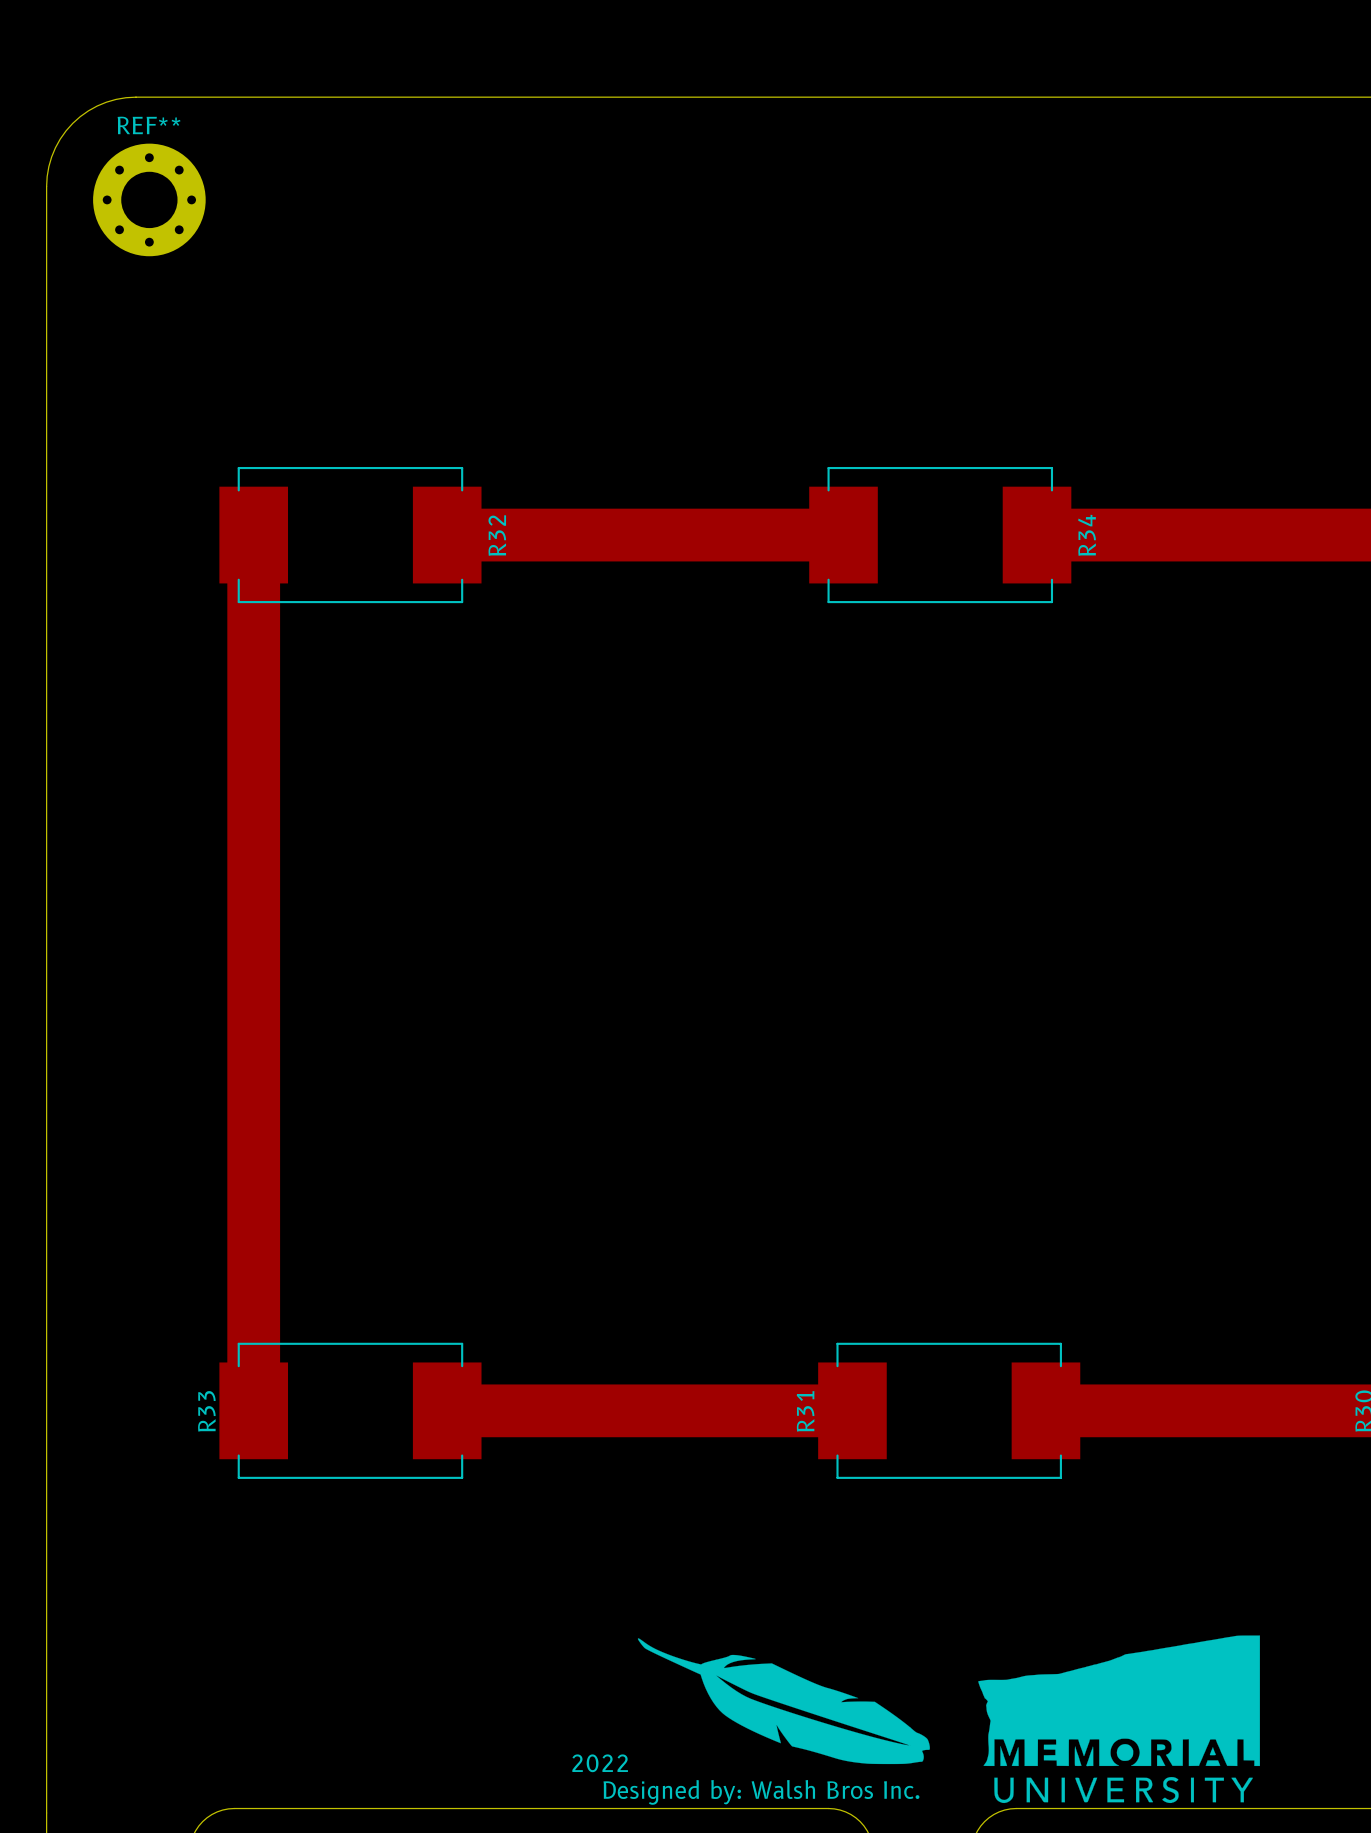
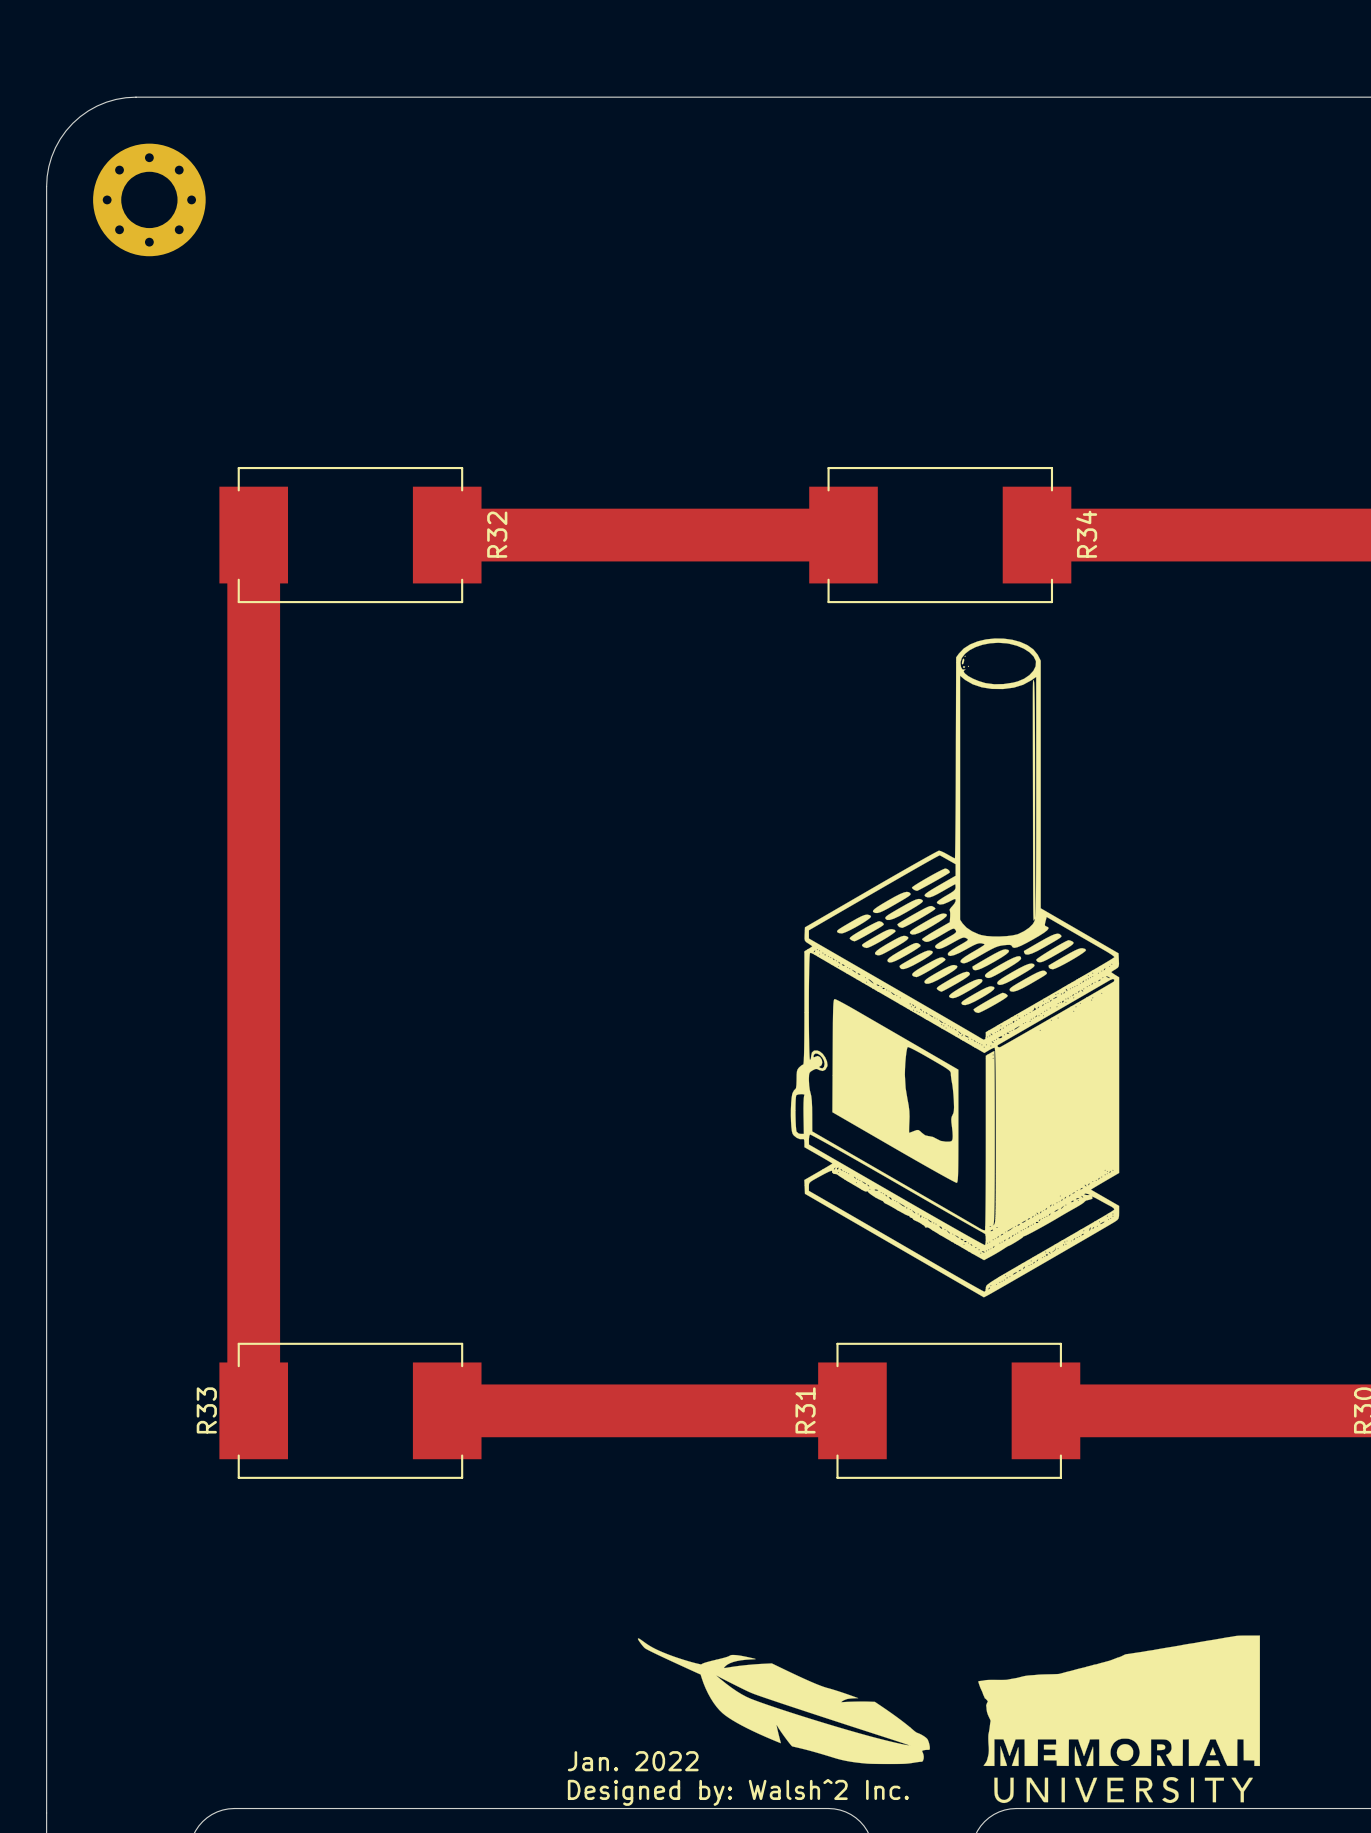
REF** name: REF** (149, 125) -> none
drawing: none -> [790, 638, 1120, 1298]
text: 2022 (600, 1763) -> Jan. 2022 (633, 1761)
text: Designed by: Walsh Bros Inc. (761, 1792) -> Designed by: Walsh^2 Inc. (738, 1792)

